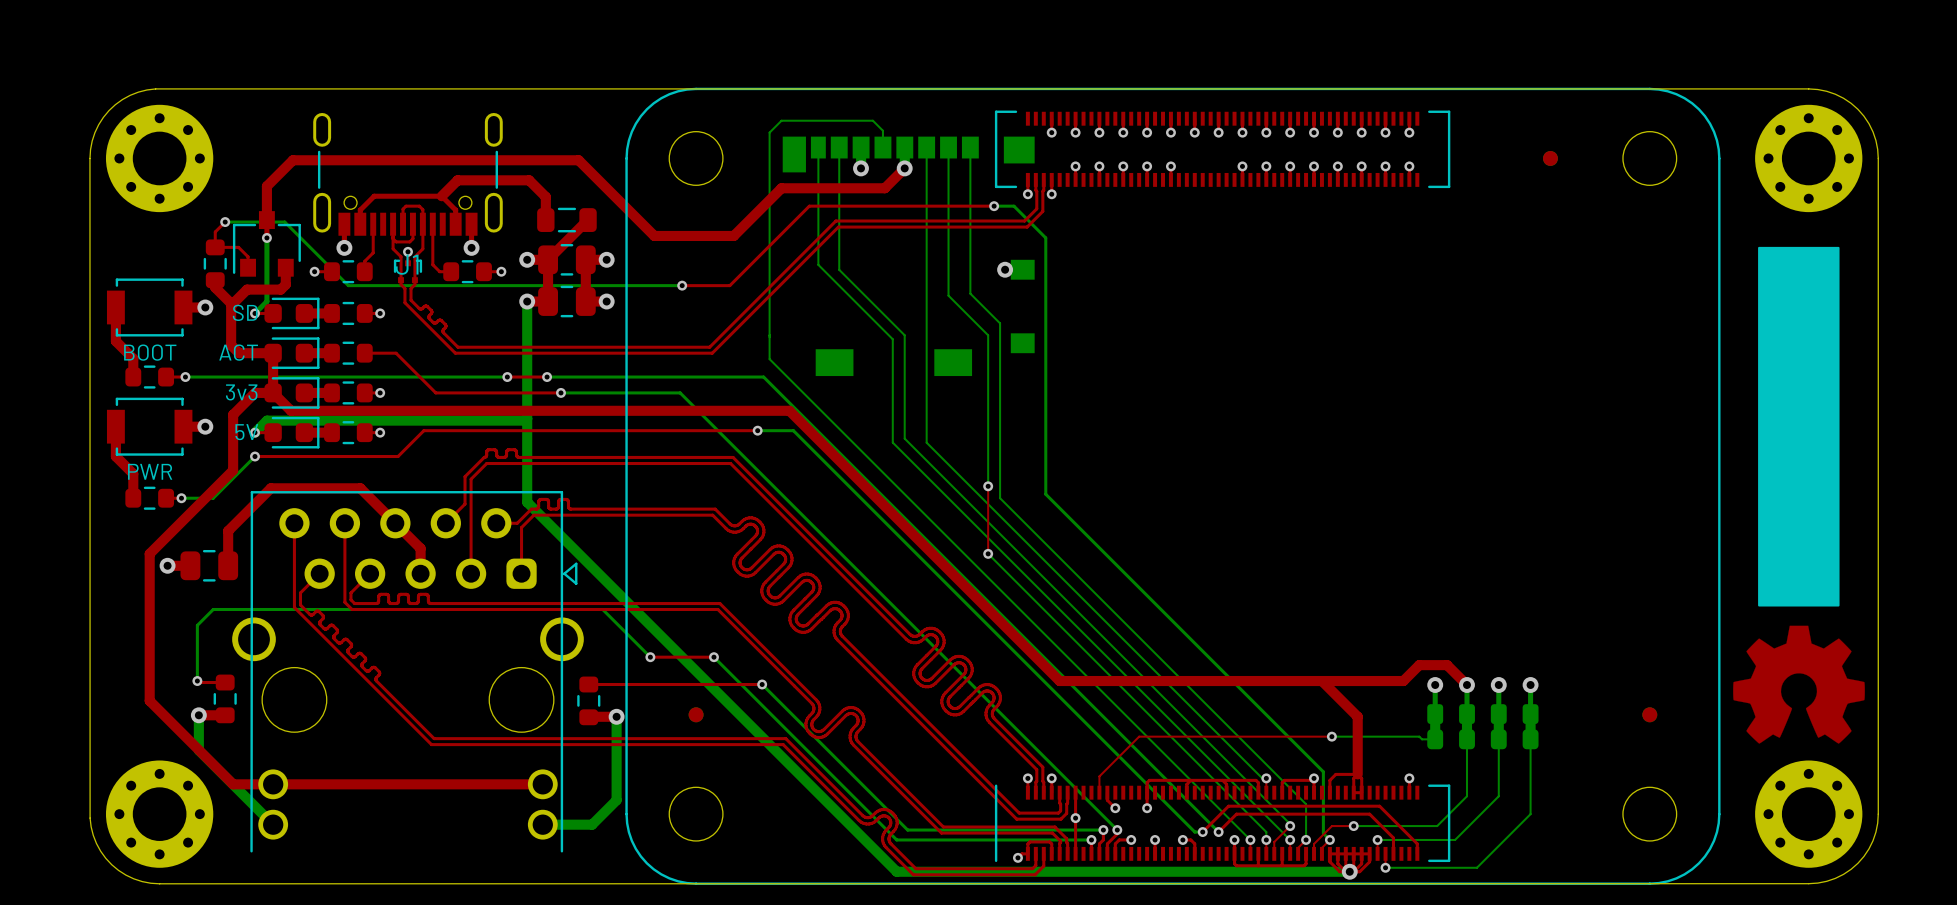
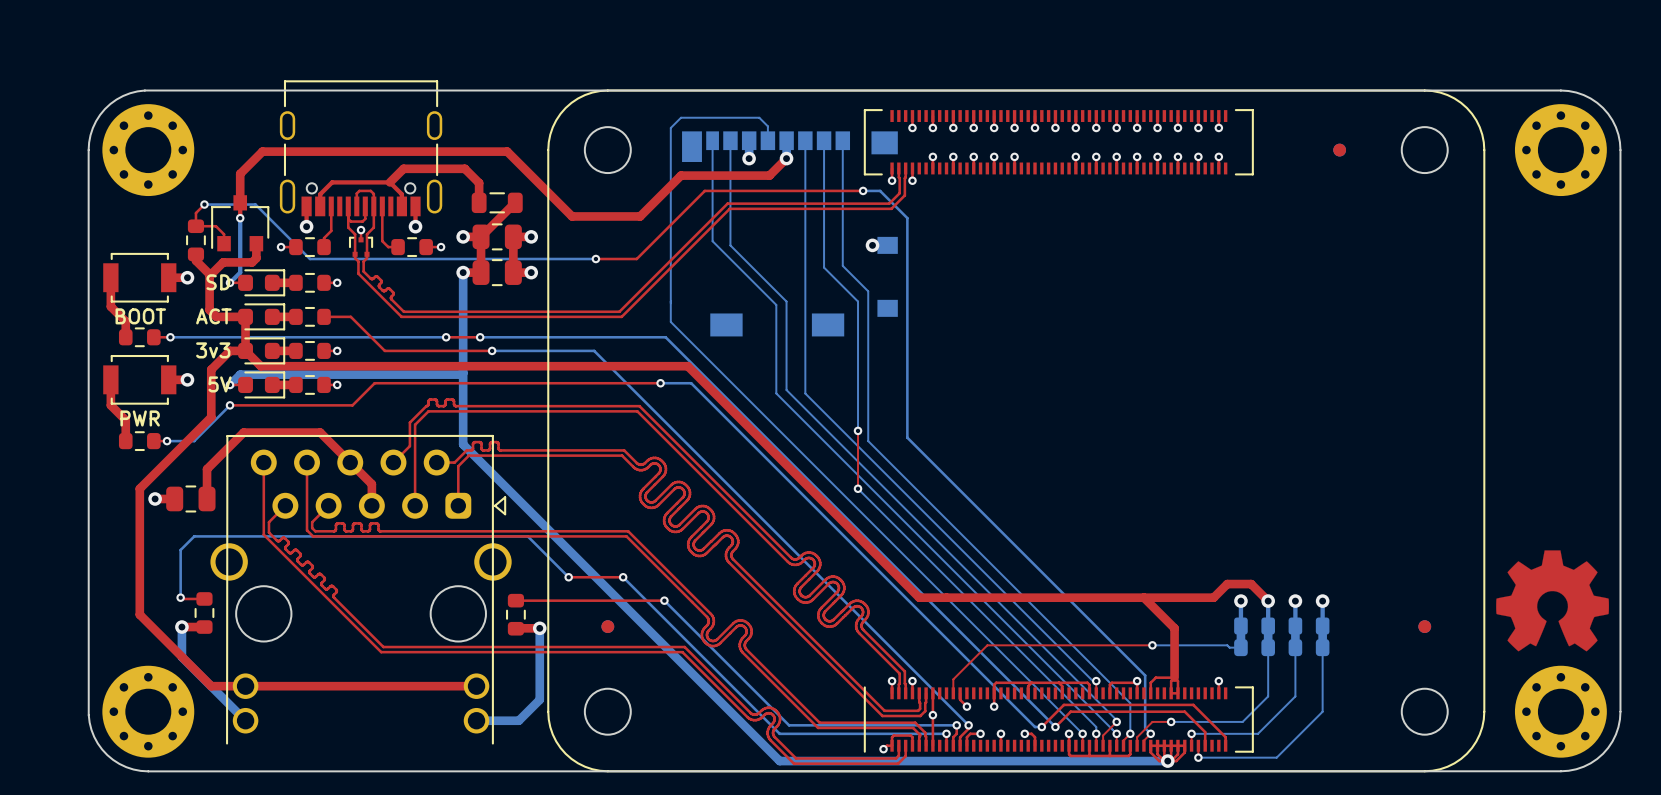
part: none -> (361, 148)
J1: (407, 174) -> none
drawing: [1758, 246, 1840, 607] -> none

